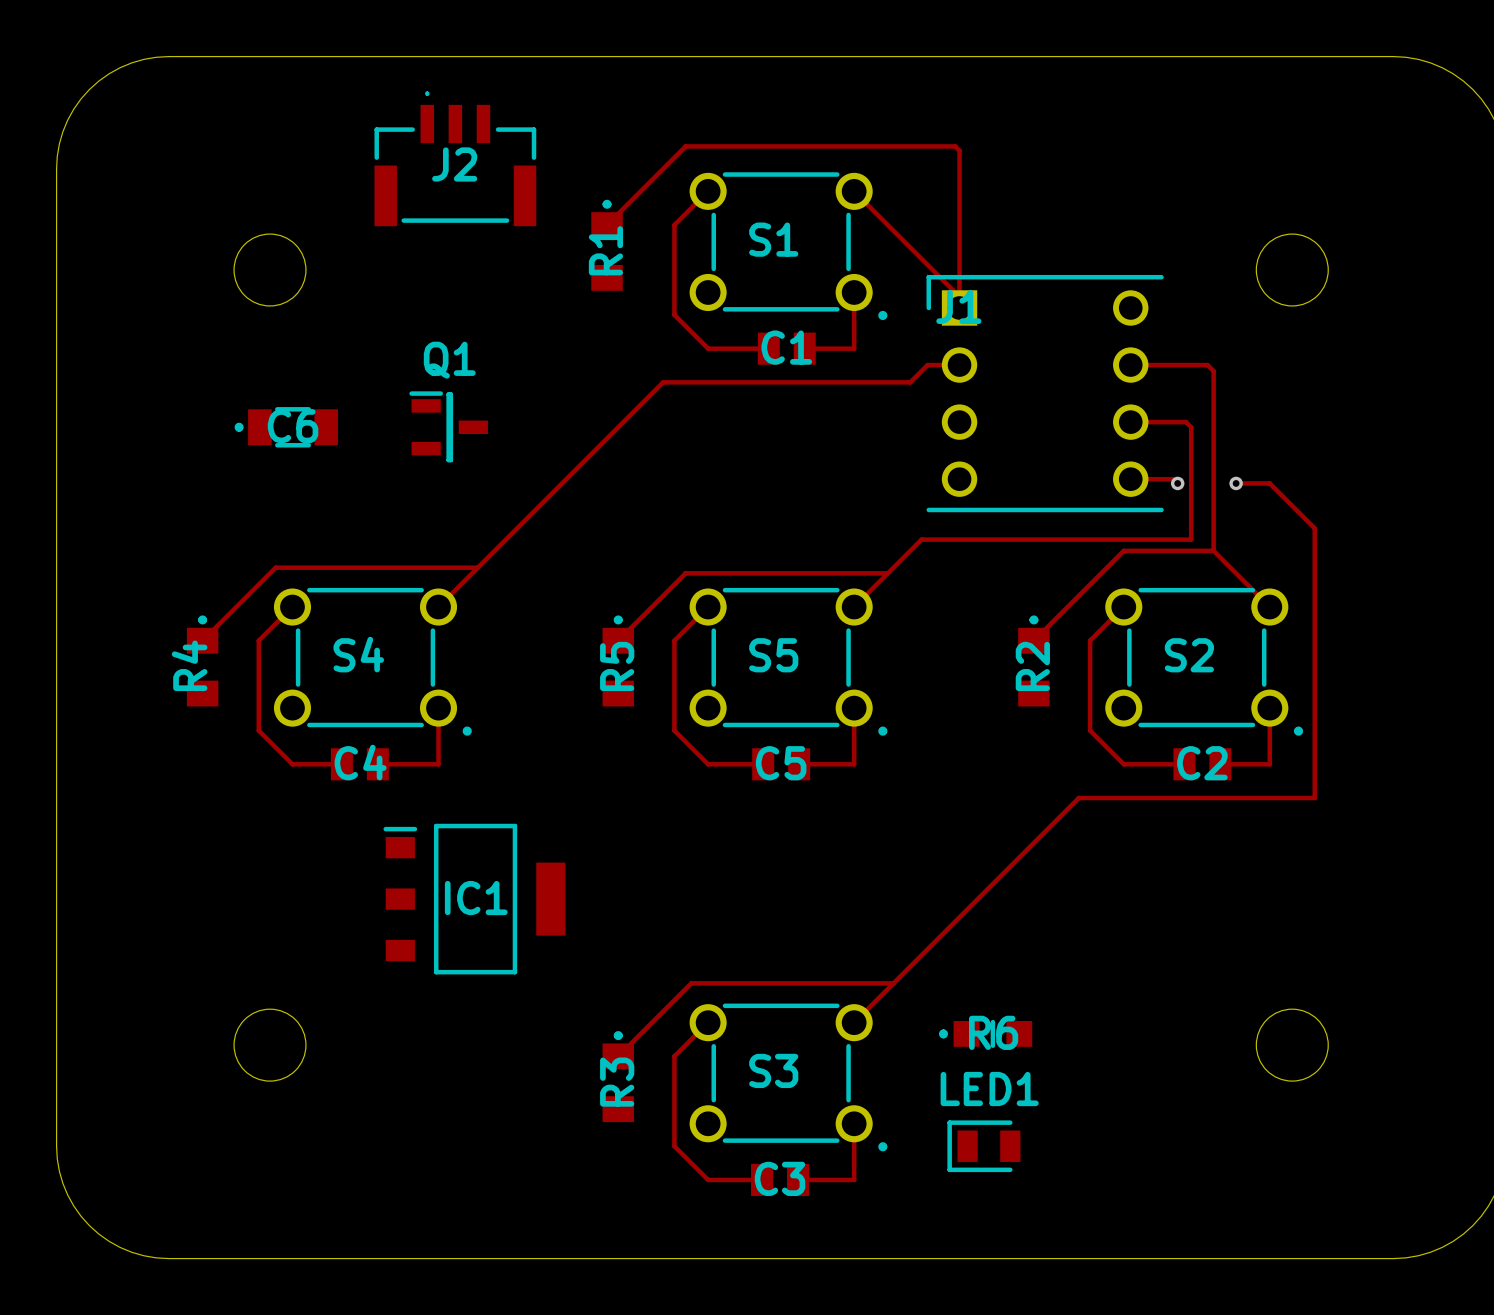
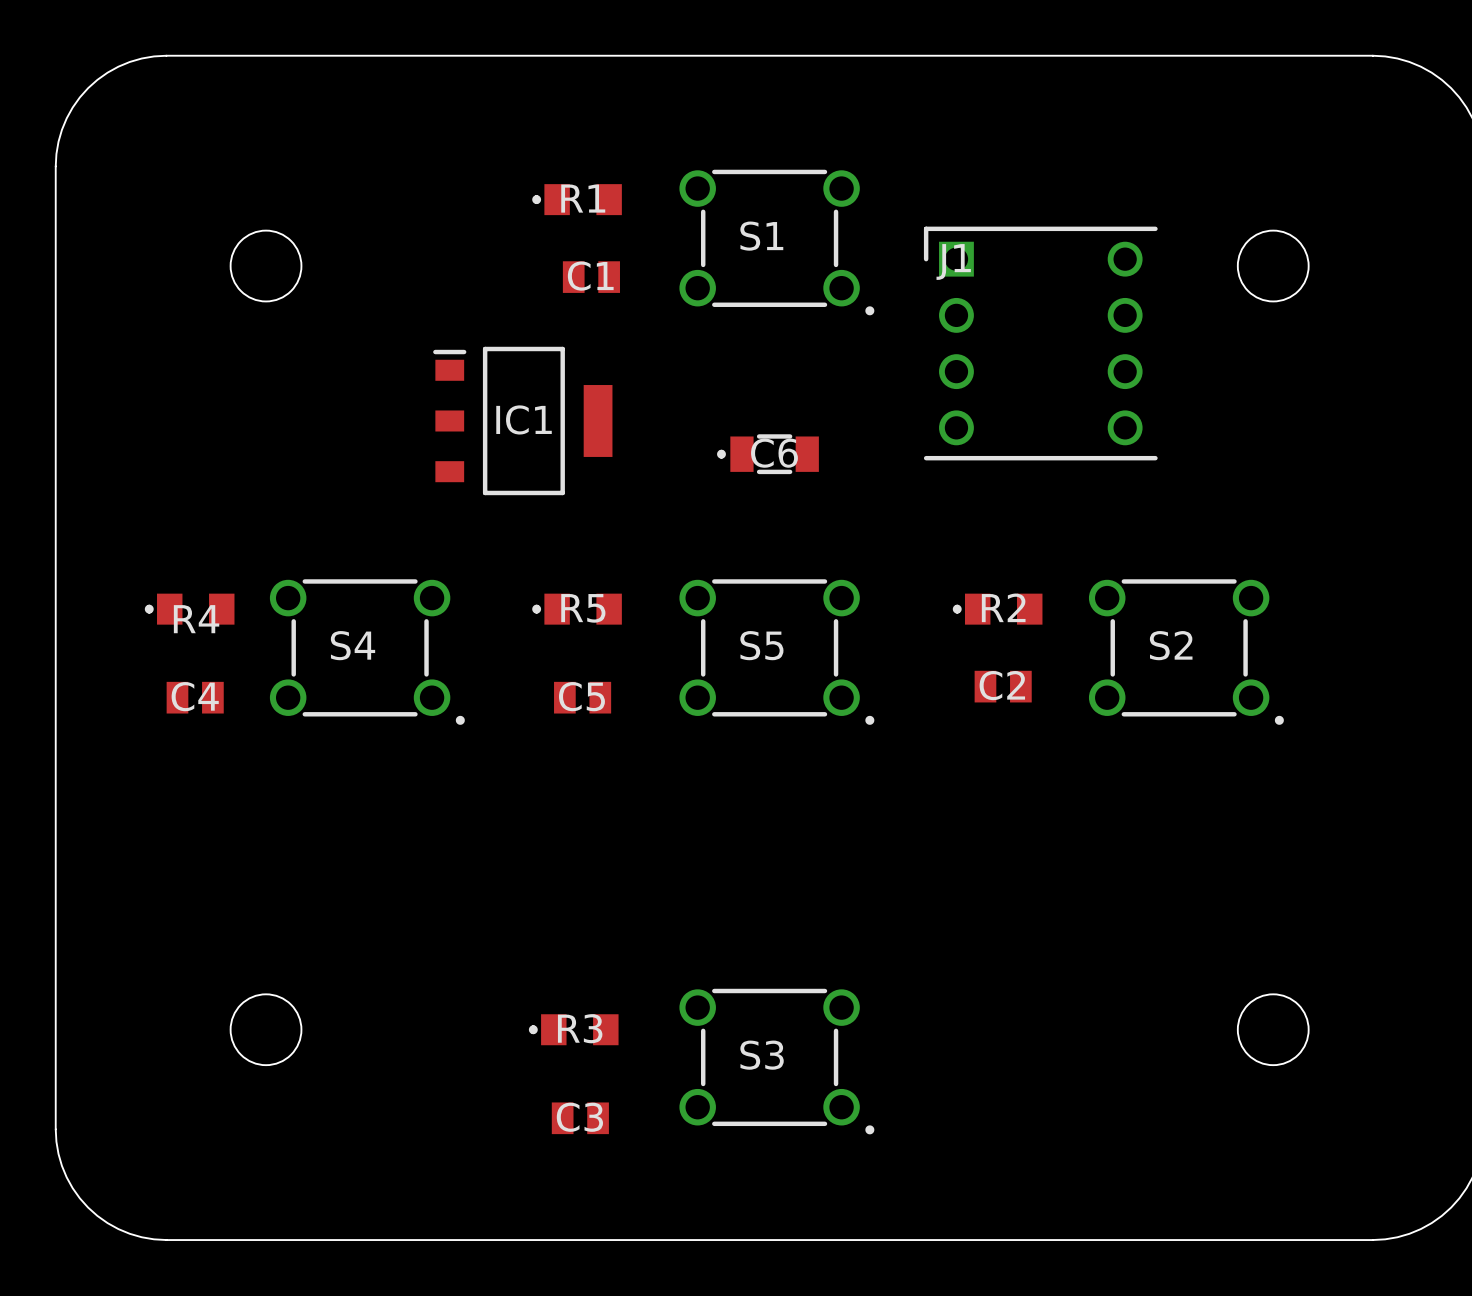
J2: (455, 158) -> none
track: (708, 191) (674, 225) (674, 314) (708, 348) (768, 348) -> none
track: (854, 191) (959, 296) -> none
track: (607, 225) (685, 146) (955, 146) (959, 150) (959, 307) -> none
R1 rotation: 0° (607, 245) -> 90° counterclockwise (577, 199)
track: (854, 292) (854, 348) (797, 348) -> none
C1 position: (786, 348) -> (591, 277)
track: (959, 365) (927, 365) (910, 382) (663, 382) (438, 607) -> none
track: (1130, 365) (1207, 365) (1213, 371) (1213, 550) -> none
J1 position: (1045, 393) -> (1040, 343)
track: (1130, 422) (1186, 422) (1191, 427) (1191, 539) (921, 539) (854, 607) -> none
Q1: (448, 426) -> none
C6 position: (286, 427) -> (767, 454)
track: (1130, 479) (1173, 479) (1177, 483) -> none
via: (1177, 483) -> none
track: (1236, 483) (1269, 483) (1314, 528) (1314, 797) (1078, 797) (854, 1022) -> none
via: (1236, 483) -> none
track: (1213, 550) (1123, 550) (1033, 640) -> none
track: (1213, 550) (1269, 607) -> none
track: (477, 567) (275, 567) (202, 640) -> none
track: (887, 573) (685, 573) (618, 640) -> none
track: (292, 607) (258, 640) (258, 730) (292, 764) (341, 764) -> none
track: (708, 607) (674, 640) (674, 730) (708, 764) (763, 764) -> none
track: (1123, 607) (1090, 640) (1090, 730) (1123, 764) (1184, 764) -> none
R4 rotation: 0° (202, 660) -> 90° counterclockwise (189, 609)
R5 rotation: 0° (618, 660) -> 90° counterclockwise (577, 609)
R2 rotation: 0° (1033, 660) -> 90° counterclockwise (997, 609)
track: (438, 708) (438, 764) (377, 764) -> none
track: (854, 708) (854, 764) (799, 764) -> none
track: (1269, 708) (1269, 764) (1220, 764) -> none
C4 position: (359, 764) -> (195, 697)
C5 position: (781, 764) -> (582, 697)
C2 position: (1202, 764) -> (1003, 686)
IC1 position: (474, 899) -> (522, 420)
track: (893, 983) (691, 983) (618, 1056) -> none
track: (708, 1022) (674, 1056) (674, 1146) (708, 1179) (762, 1179) -> none
R6: (985, 1033) -> none
R3 rotation: 0° (618, 1076) -> 90° counterclockwise (573, 1029)
track: (854, 1123) (854, 1179) (797, 1179) -> none
LED1: (983, 1146) -> none
C3 position: (780, 1179) -> (580, 1118)

